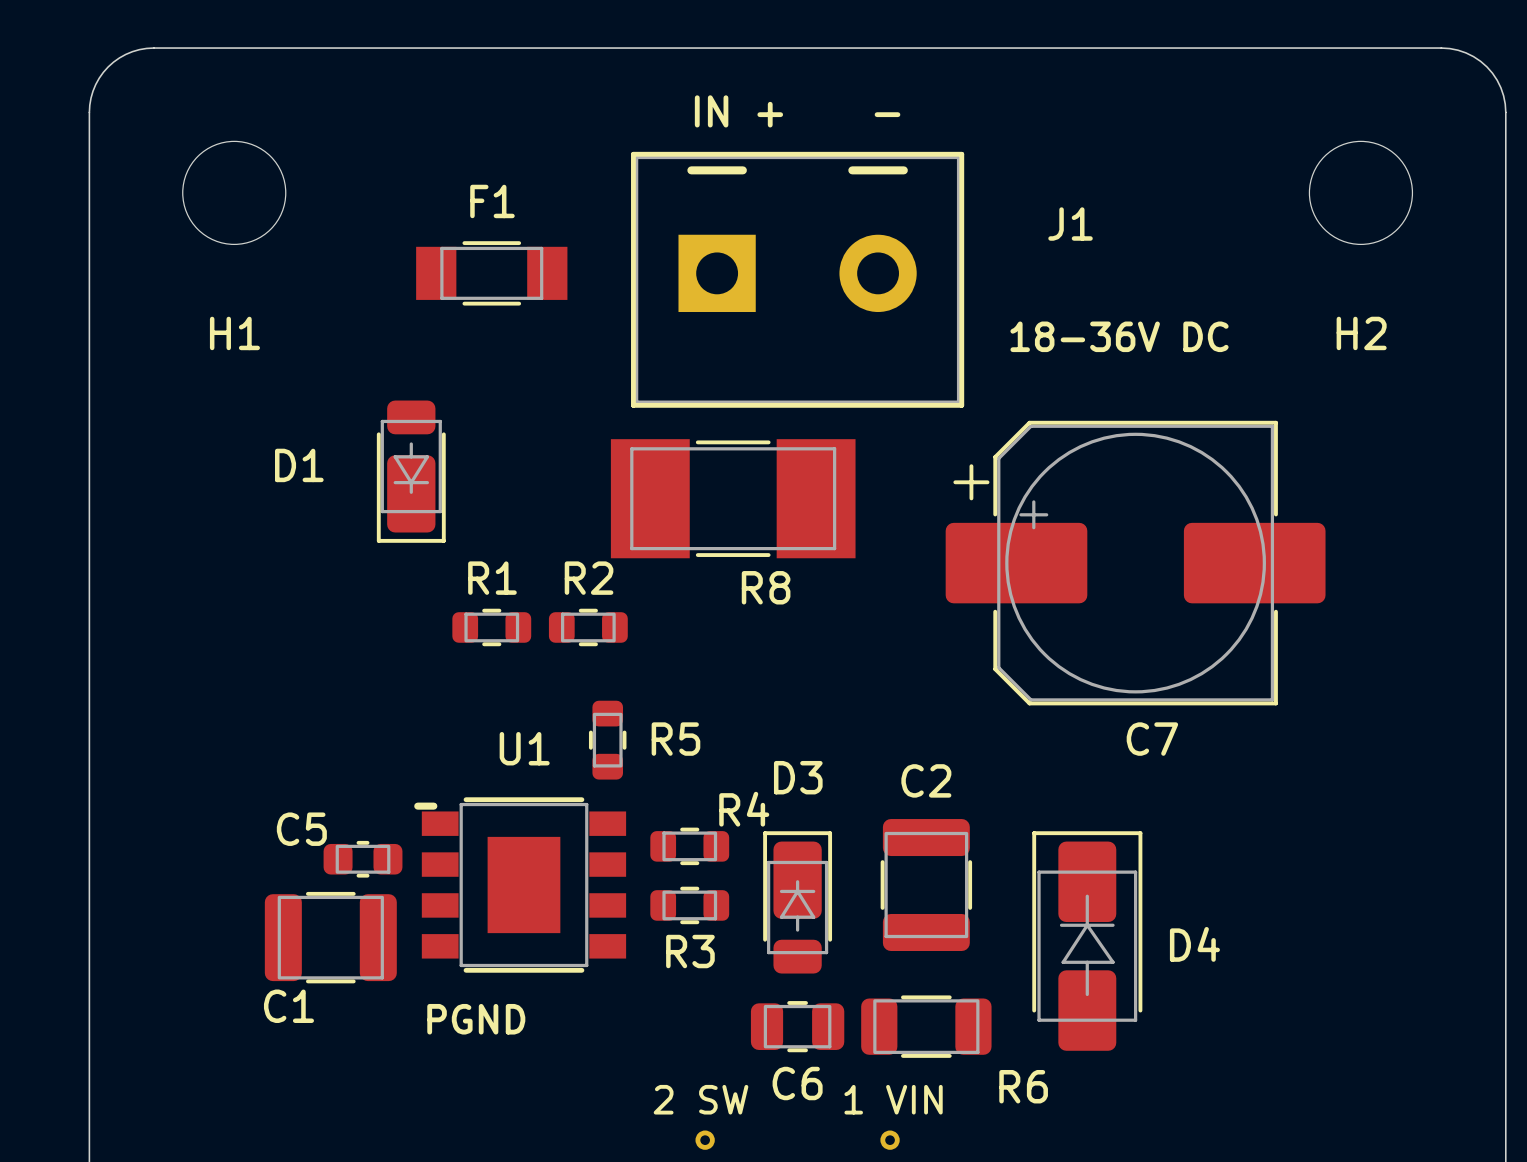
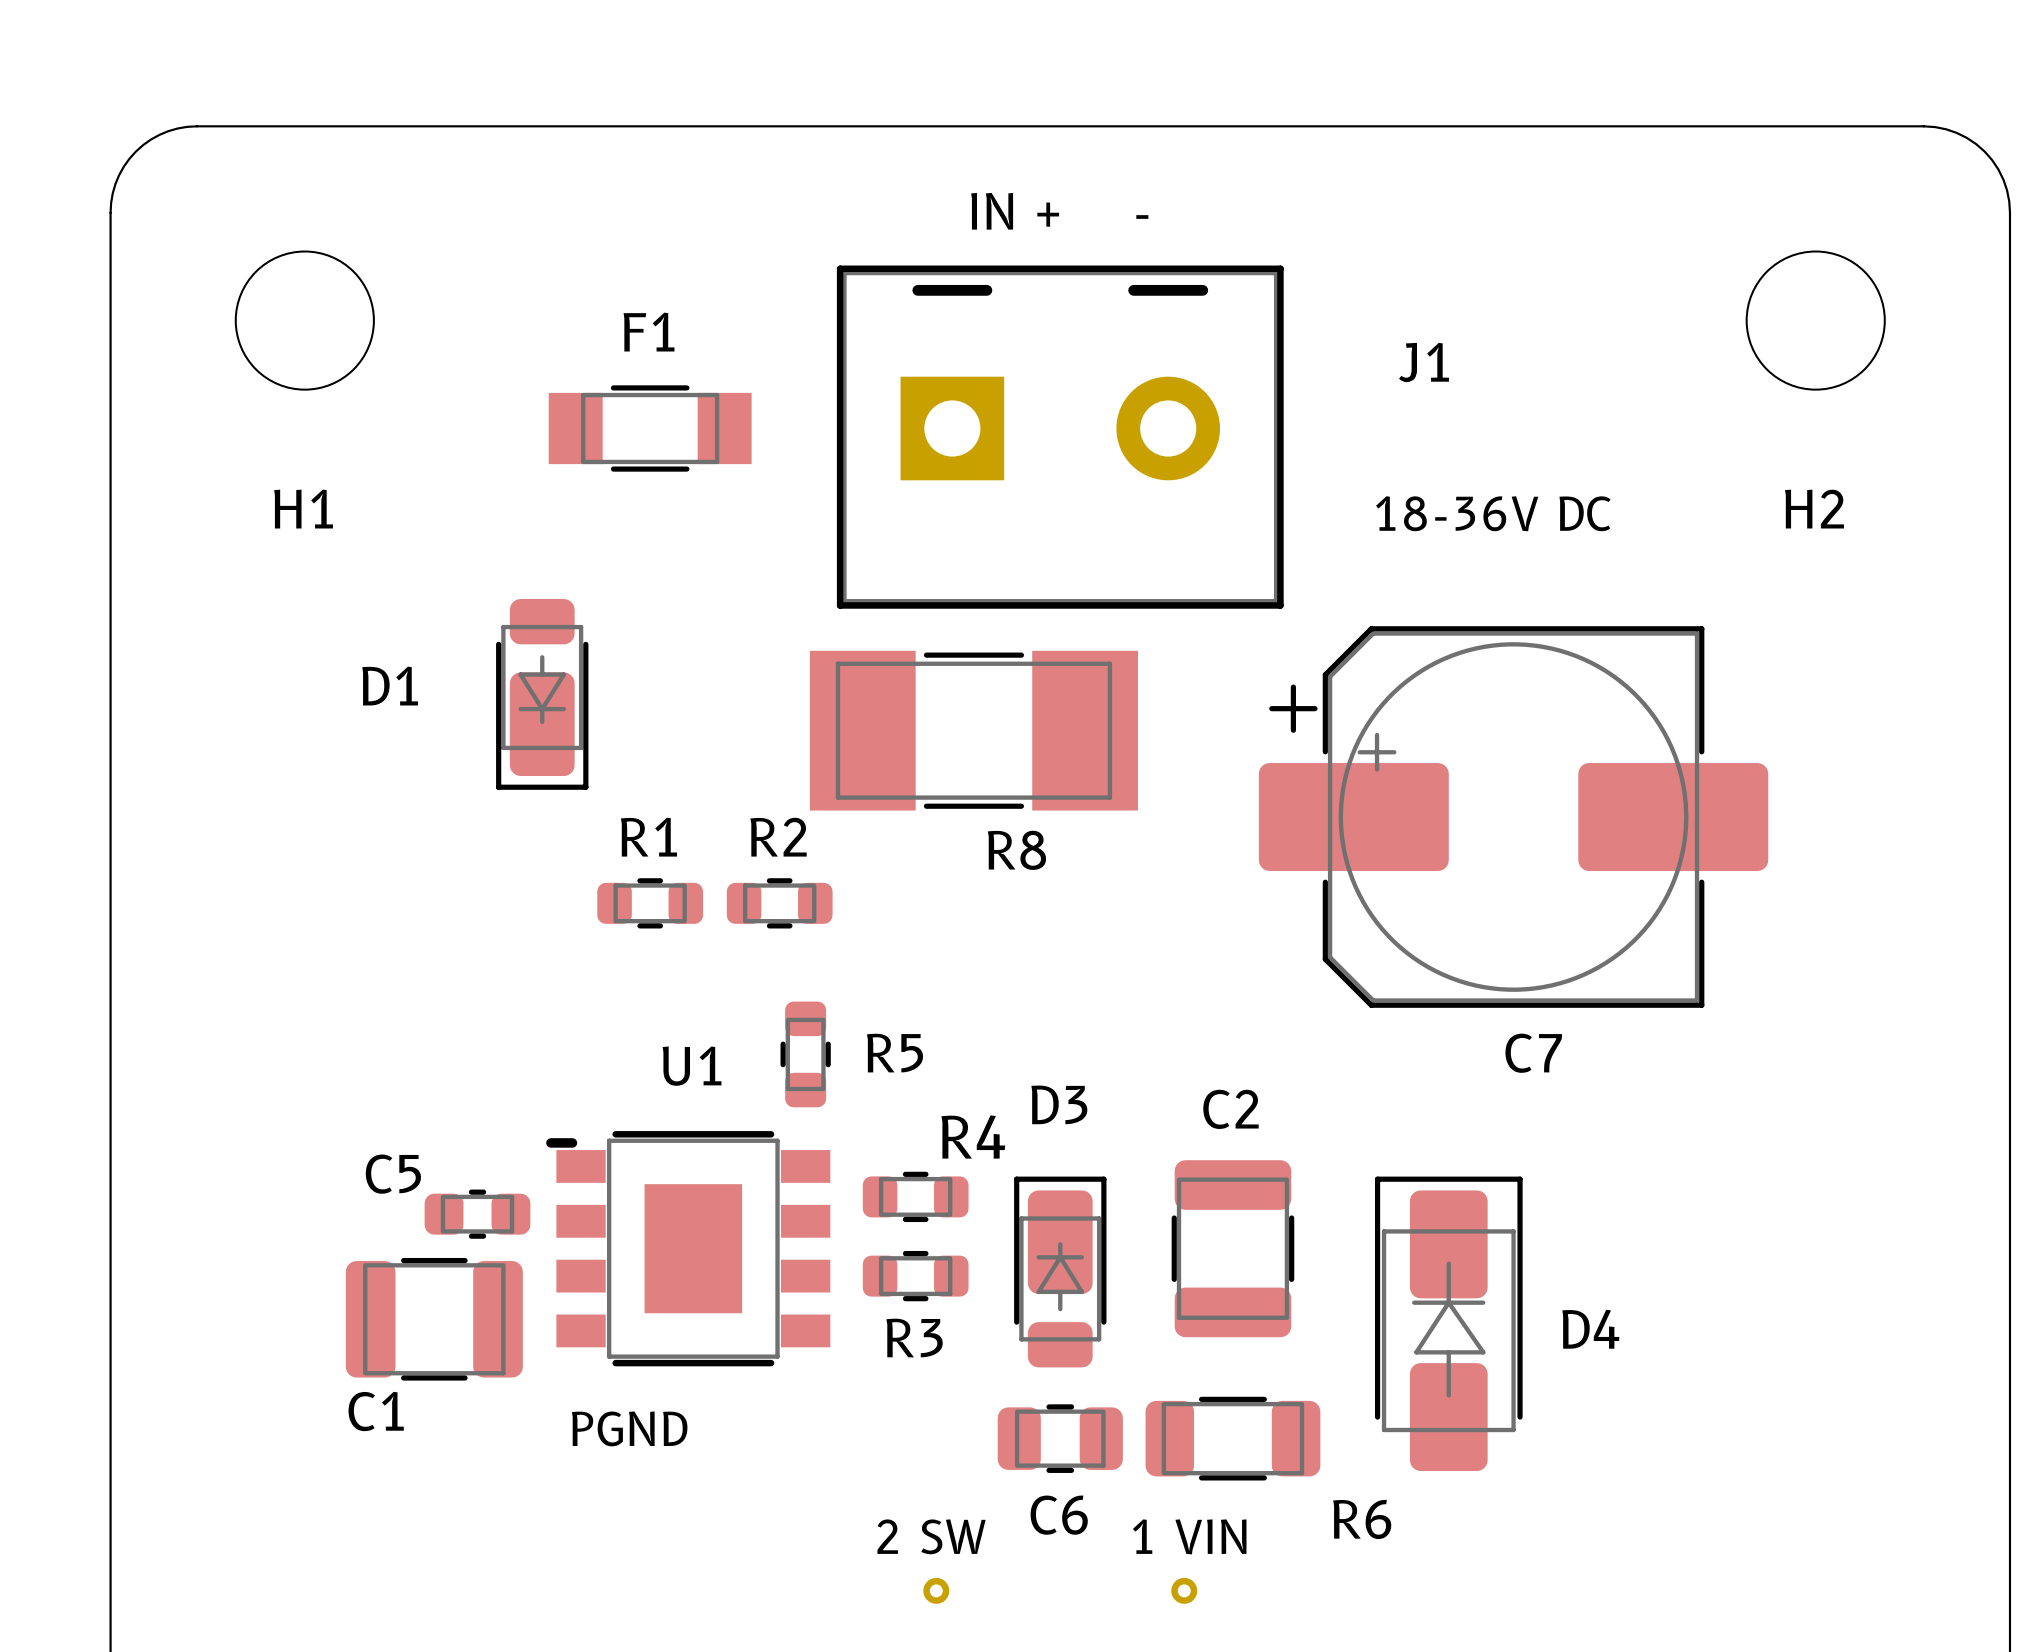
R4 name position: R4 (744, 809) -> R4 (973, 1137)

